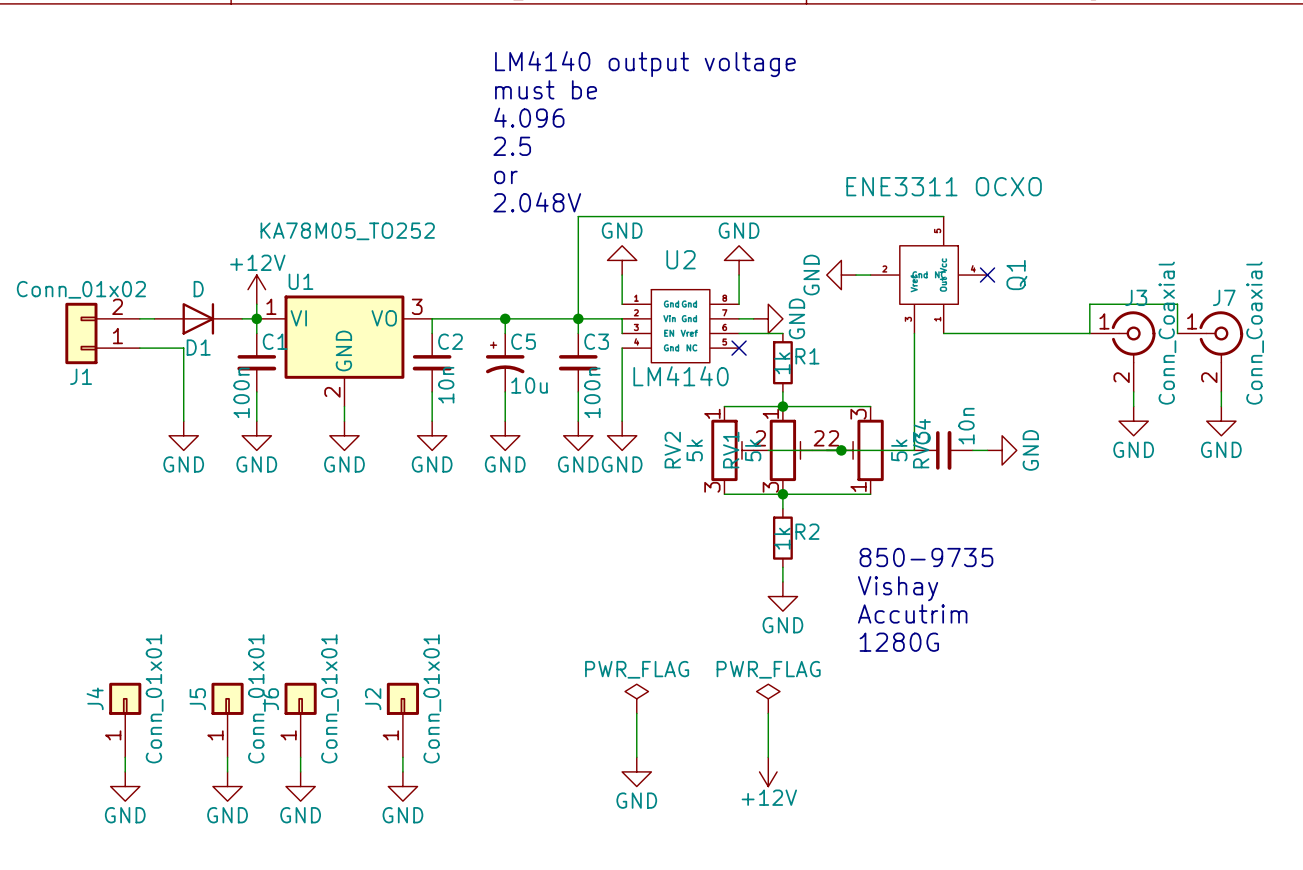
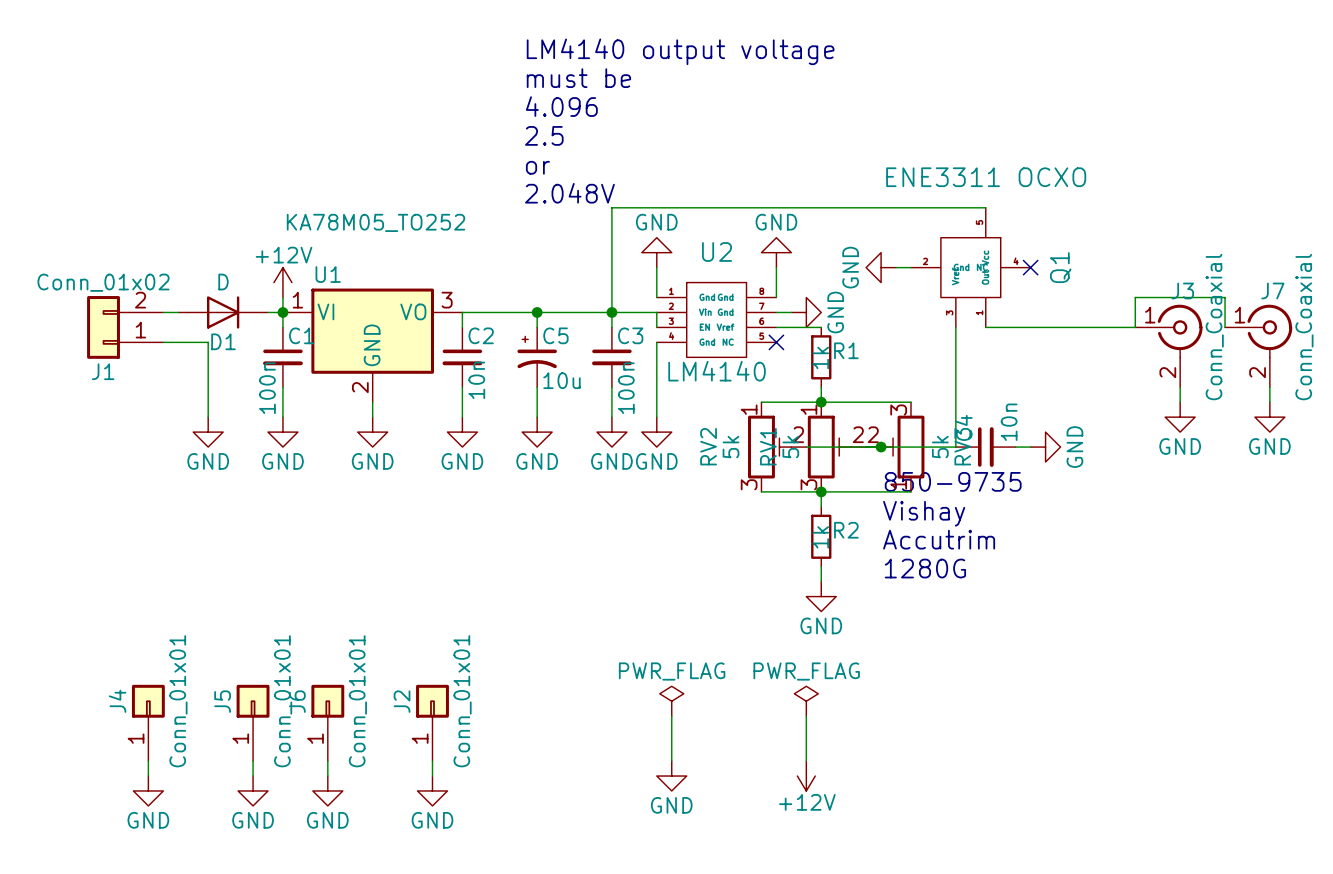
text position: 850-9735 (926, 557) -> 850-9735 (953, 481)
text position: Vishay (898, 588) -> Vishay (924, 513)
text position: Accutrim (912, 613) -> Accutrim (939, 539)
text position: 1280G (899, 642) -> 1280G (925, 568)

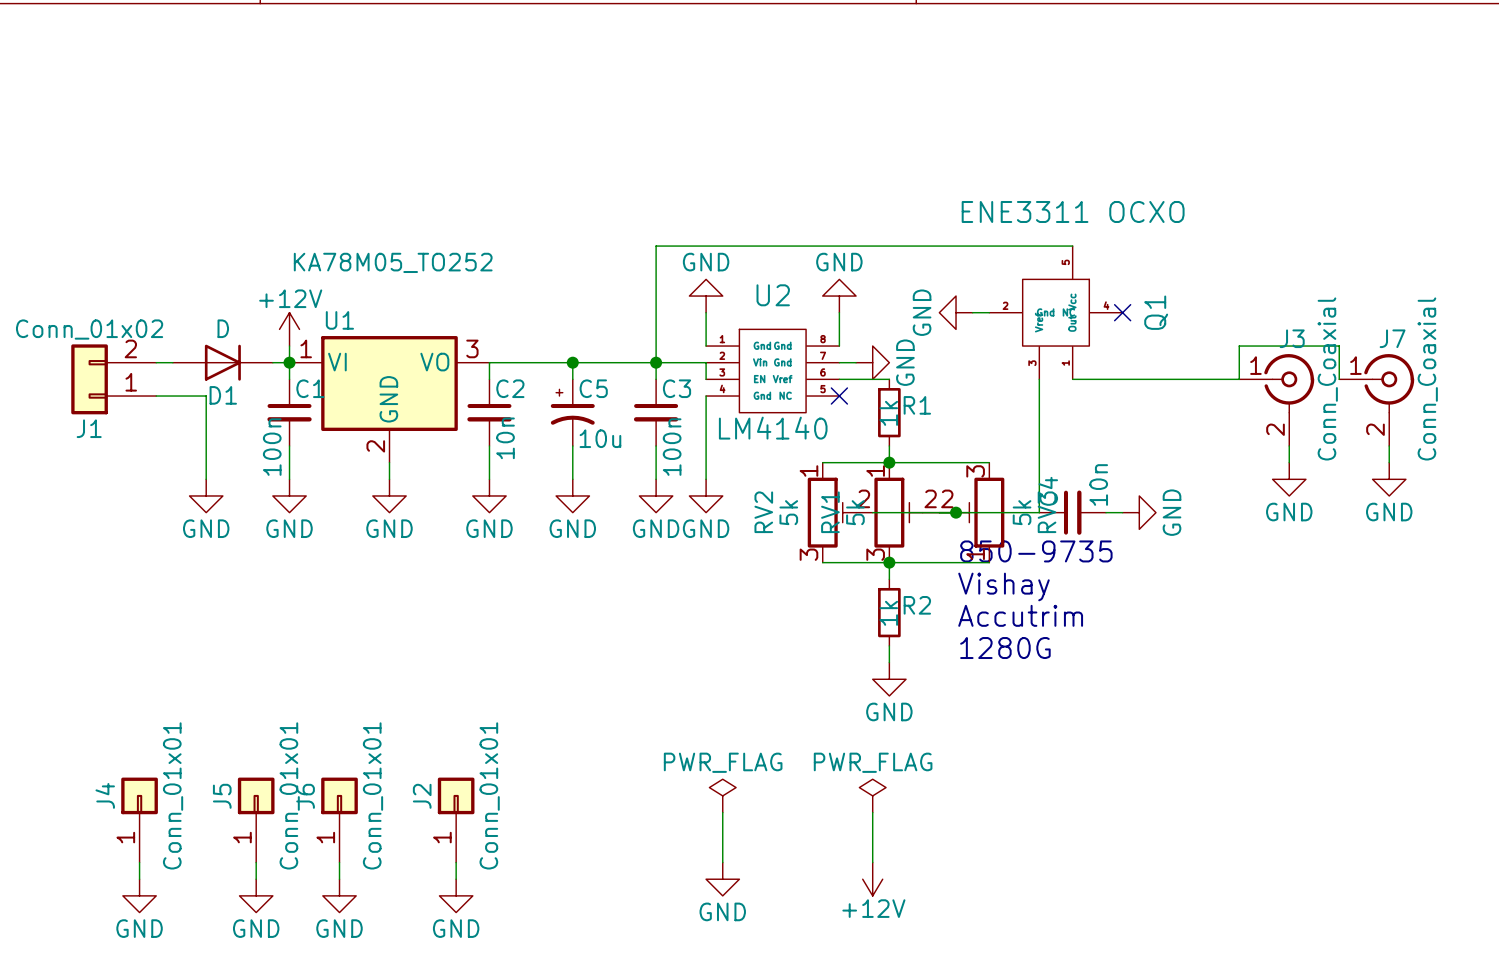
text: LM4140 output voltage (680, 51) -> none
text: must be (578, 78) -> none
text: 4.096 (561, 106) -> none
text: 2.5 (544, 135) -> none
text: or (537, 167) -> none
text: 2.048V (569, 193) -> none

